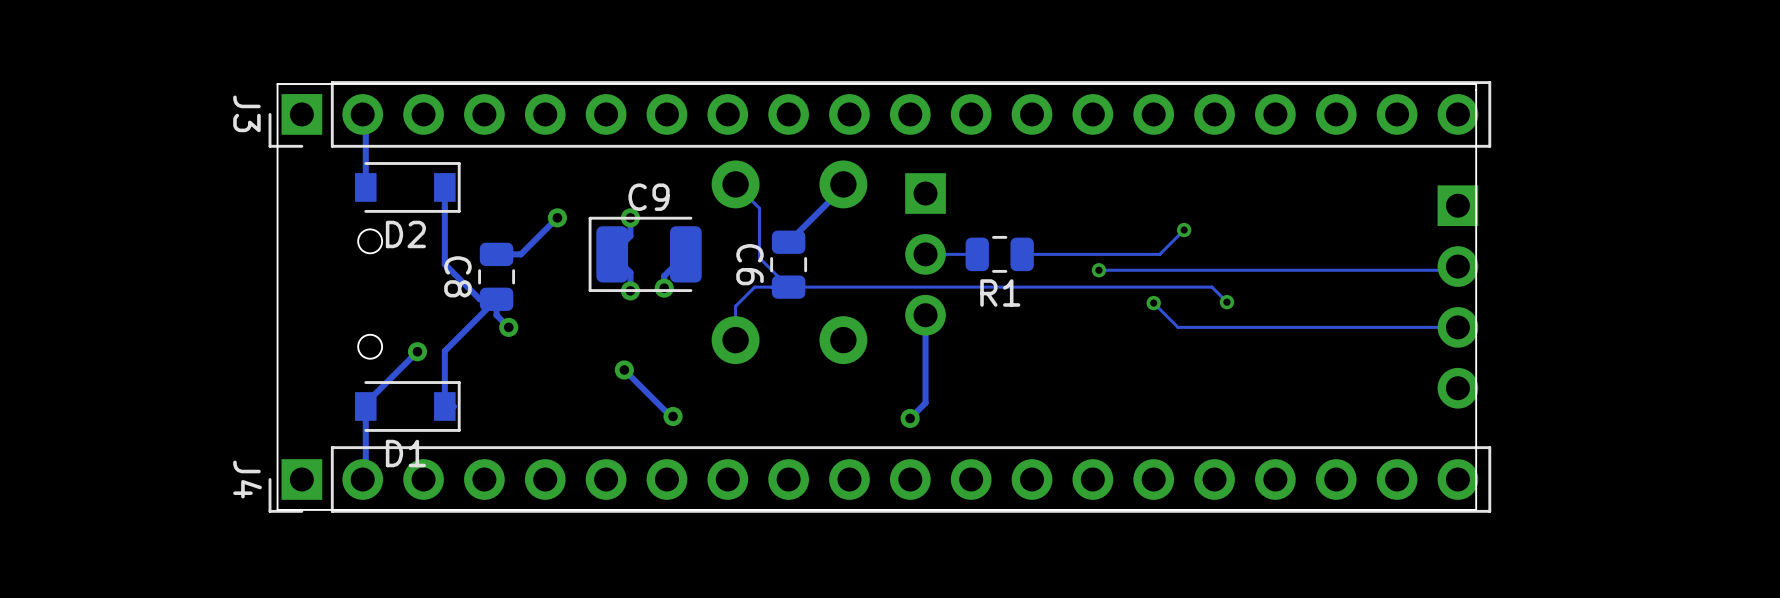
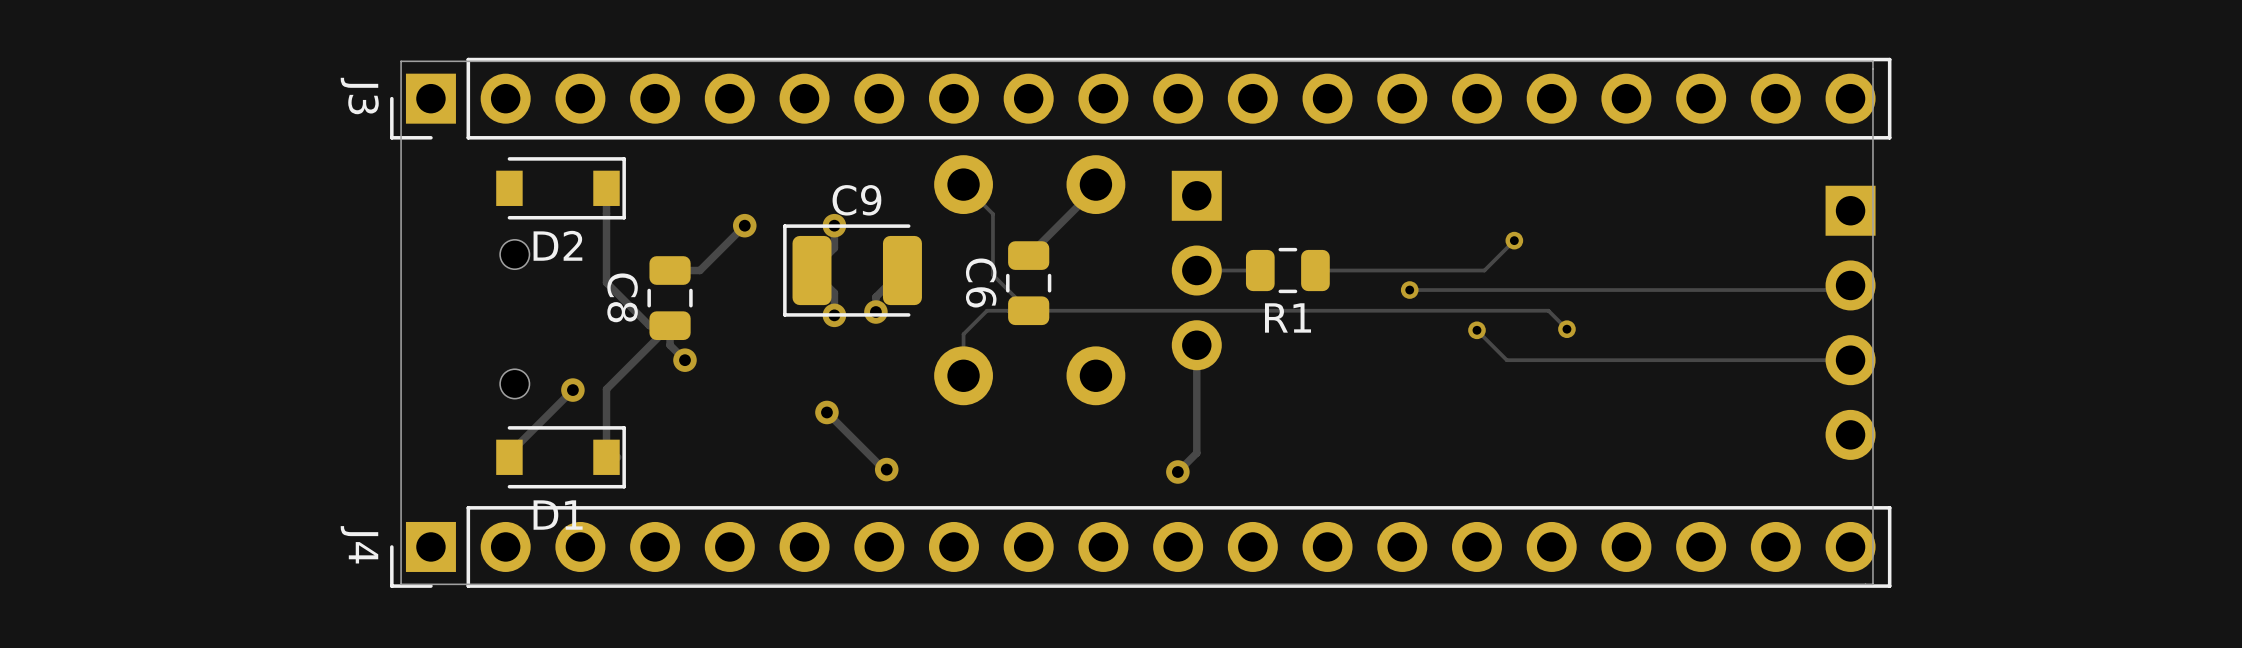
track: (365, 117) (365, 181) -> none
track: (365, 406) (365, 476) -> none

